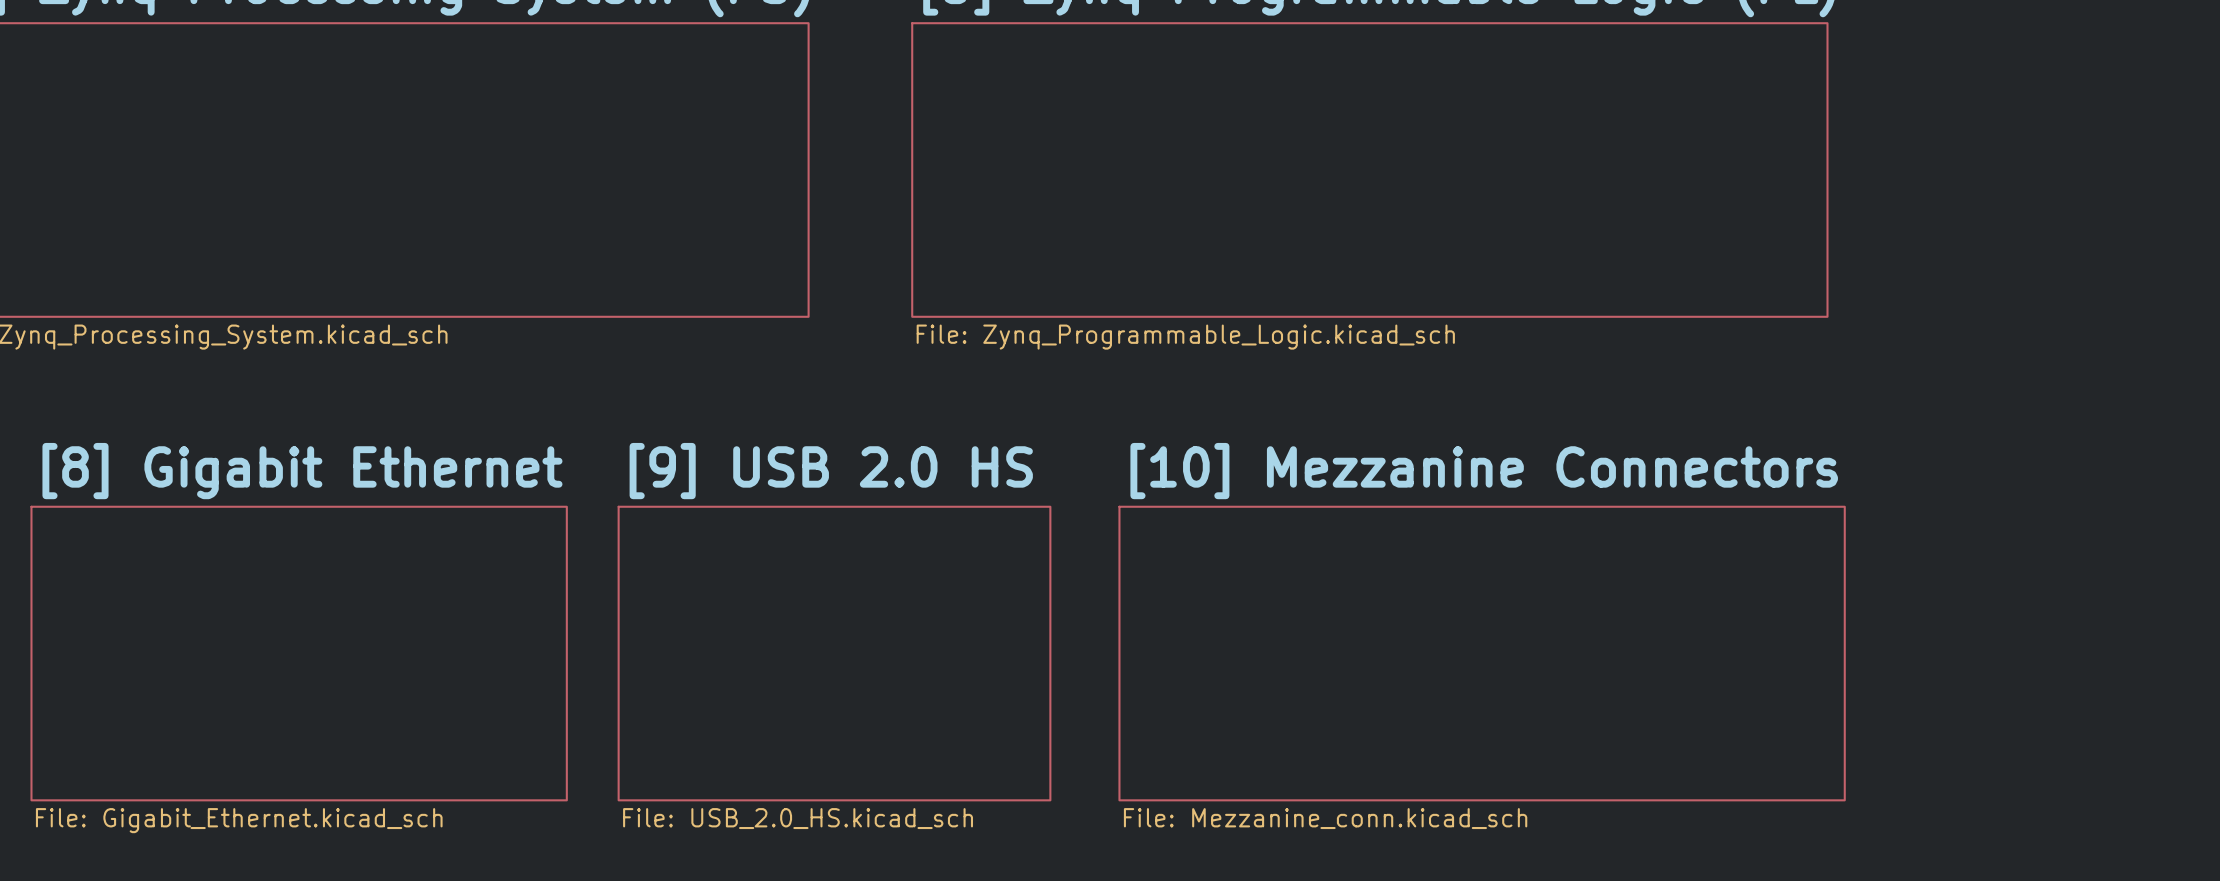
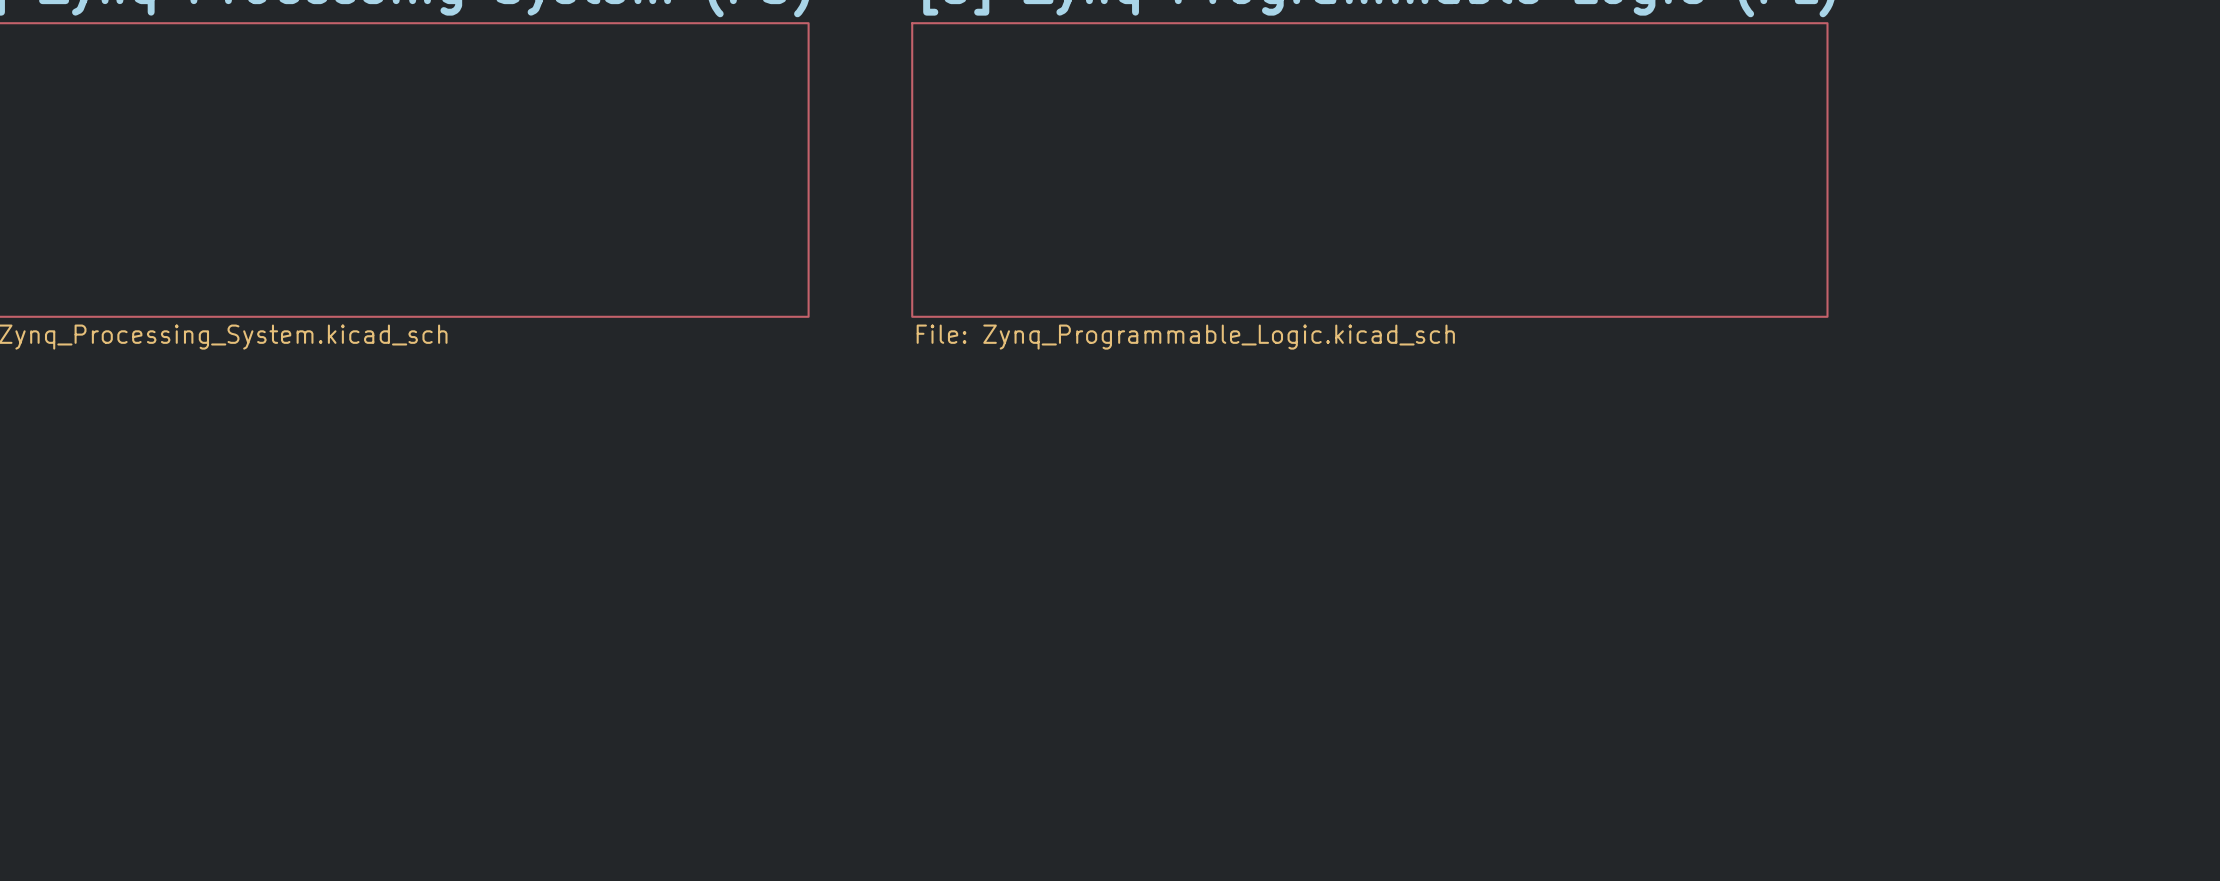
sheet [8] Gigabit Ethernet: File: Gigabit_Ethernet.kicad_sch (299, 653) -> none
sheet [9] USB 2.0 HS: File: USB_2.0_HS.kicad_sch (834, 653) -> none
sheet [10] Mezzanine Connectors: File: Mezzanine_conn.kicad_sch (1482, 653) -> none

